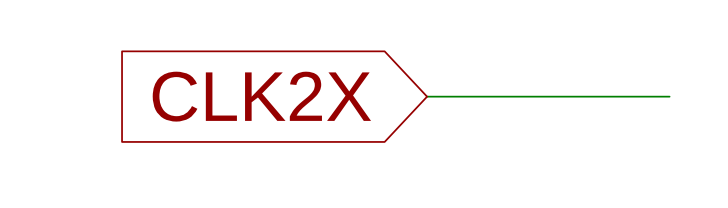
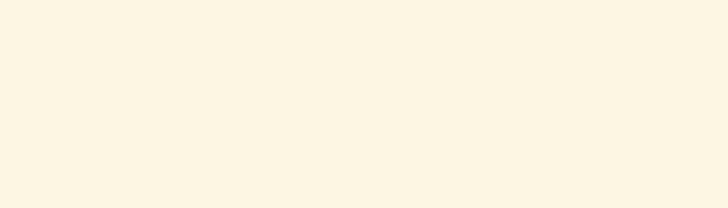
global label: CLK2X (261, 96) -> none
wire: (427, 96) (669, 96) -> none

